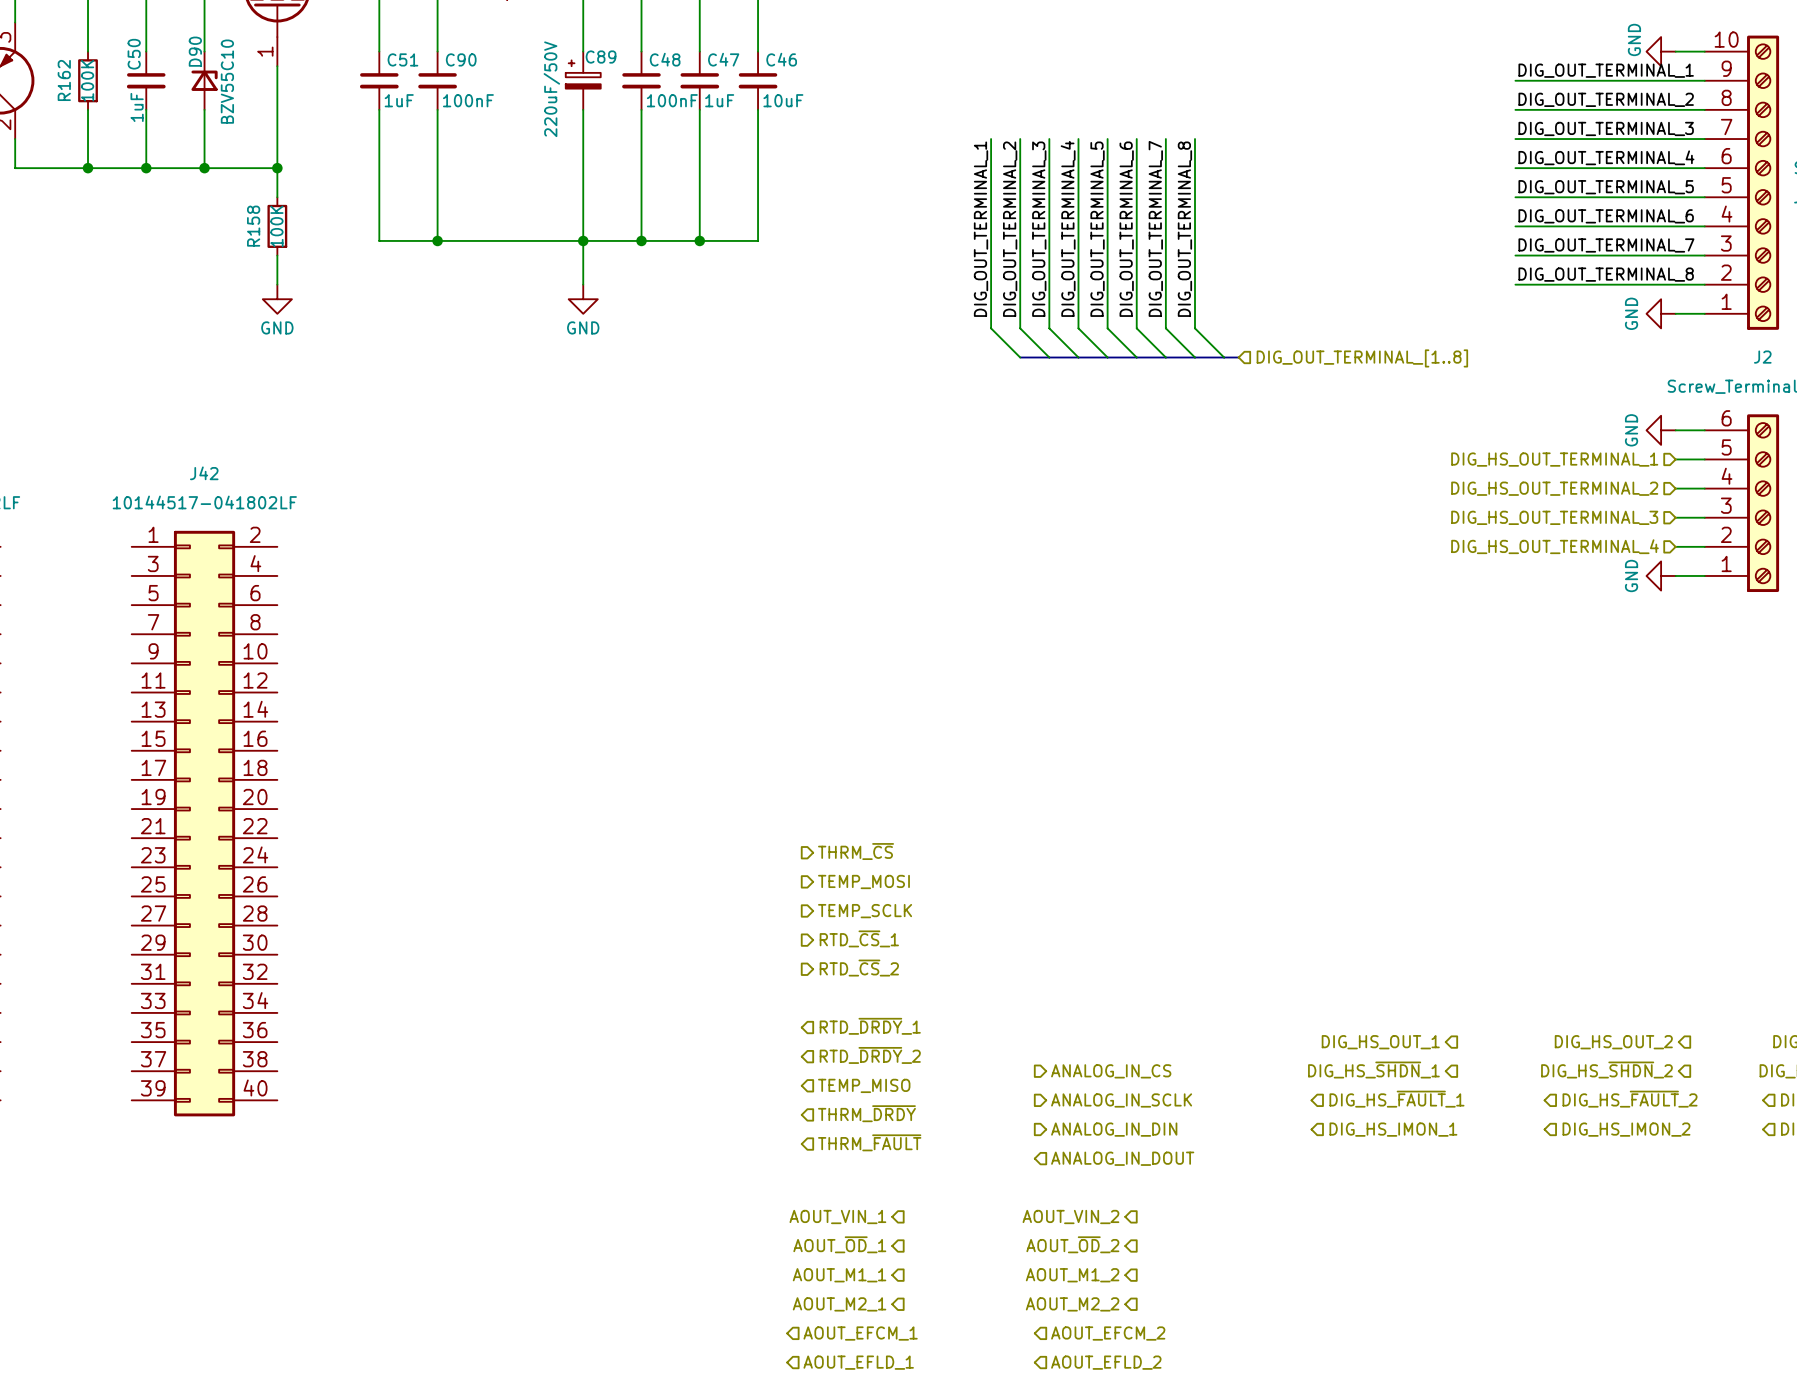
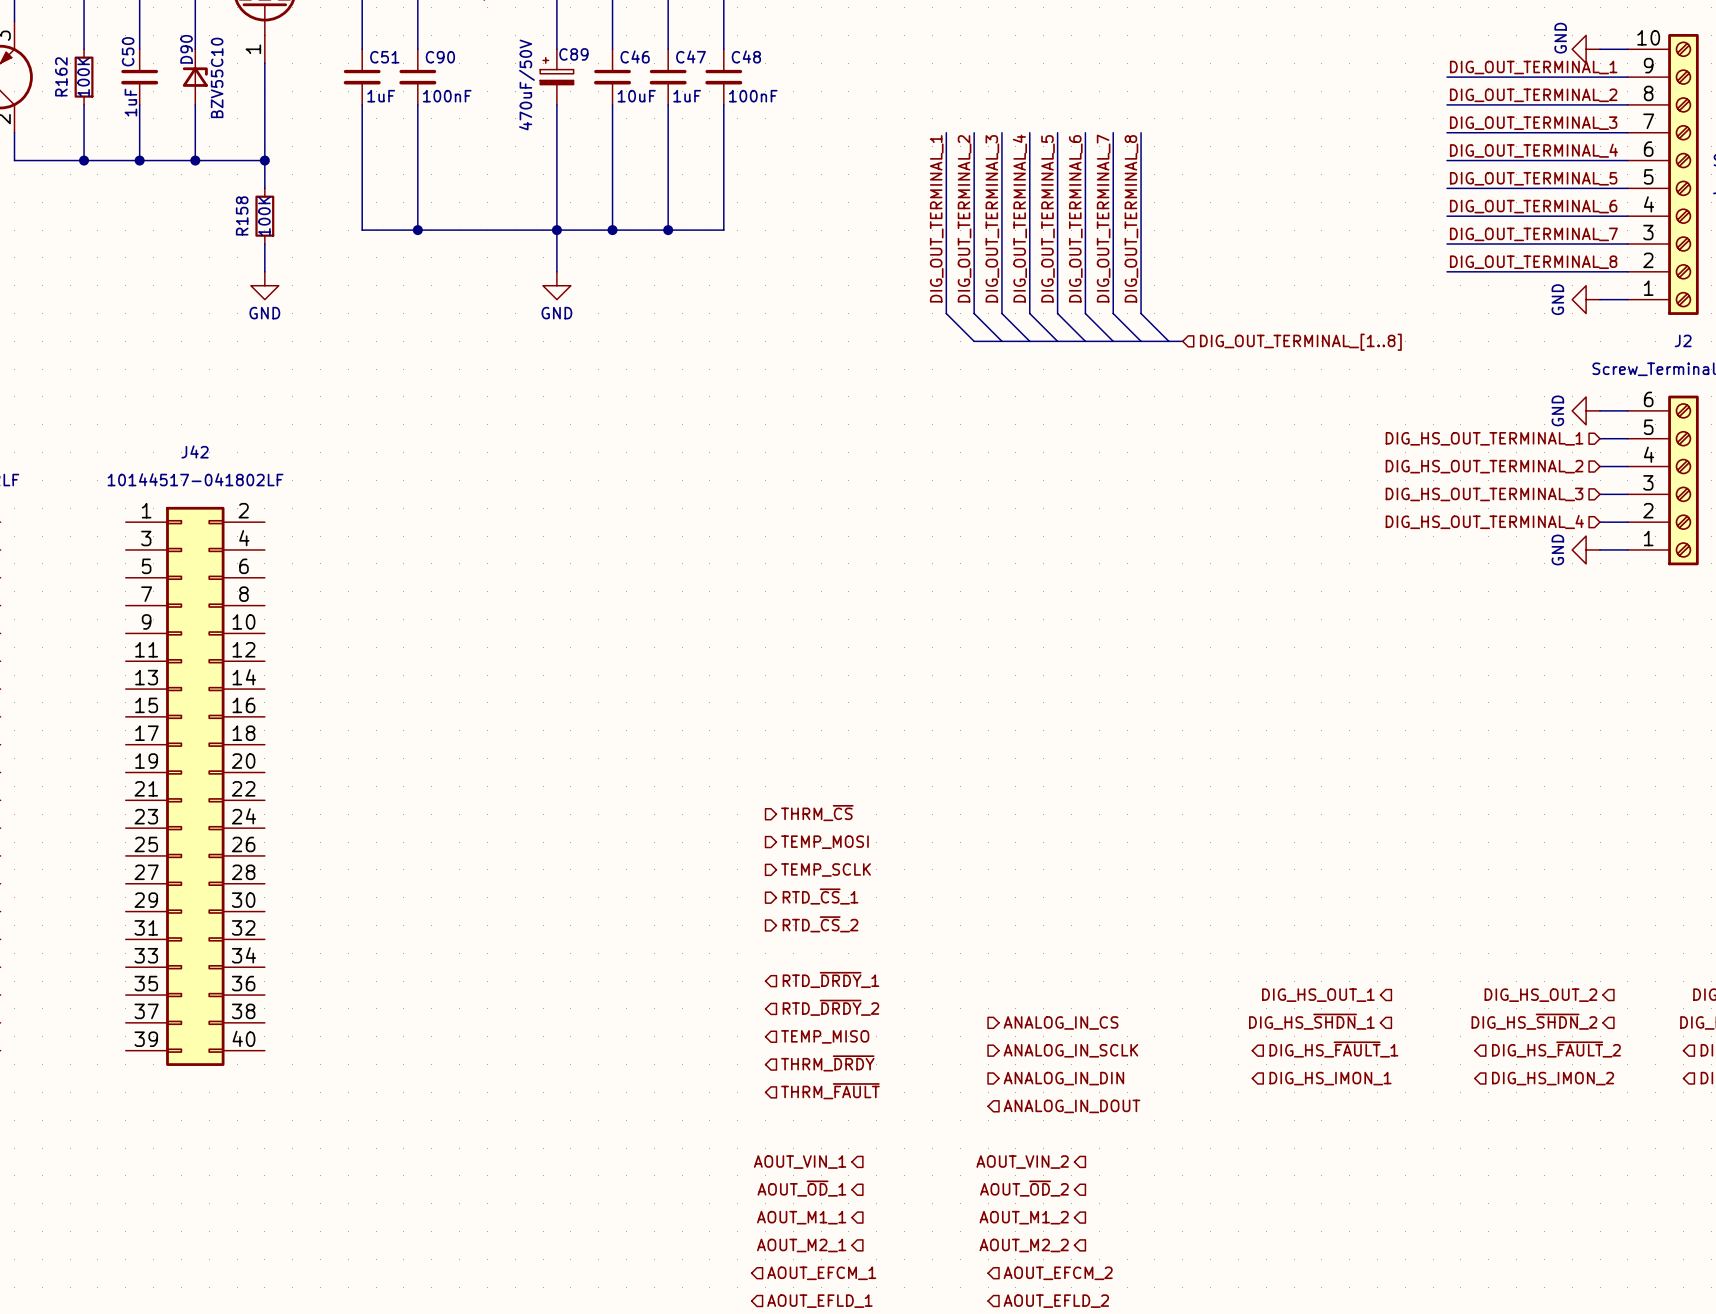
C48 name: C48 (665, 59) -> C46 (635, 56)
C46 name: C46 (781, 59) -> C48 (746, 56)
C89 value: 220uF/50V (551, 89) -> 470uF/50V (526, 84)
C48 value: 100nF (672, 100) -> 10uF (636, 96)
C46 value: 10uF (783, 100) -> 100nF (753, 96)

